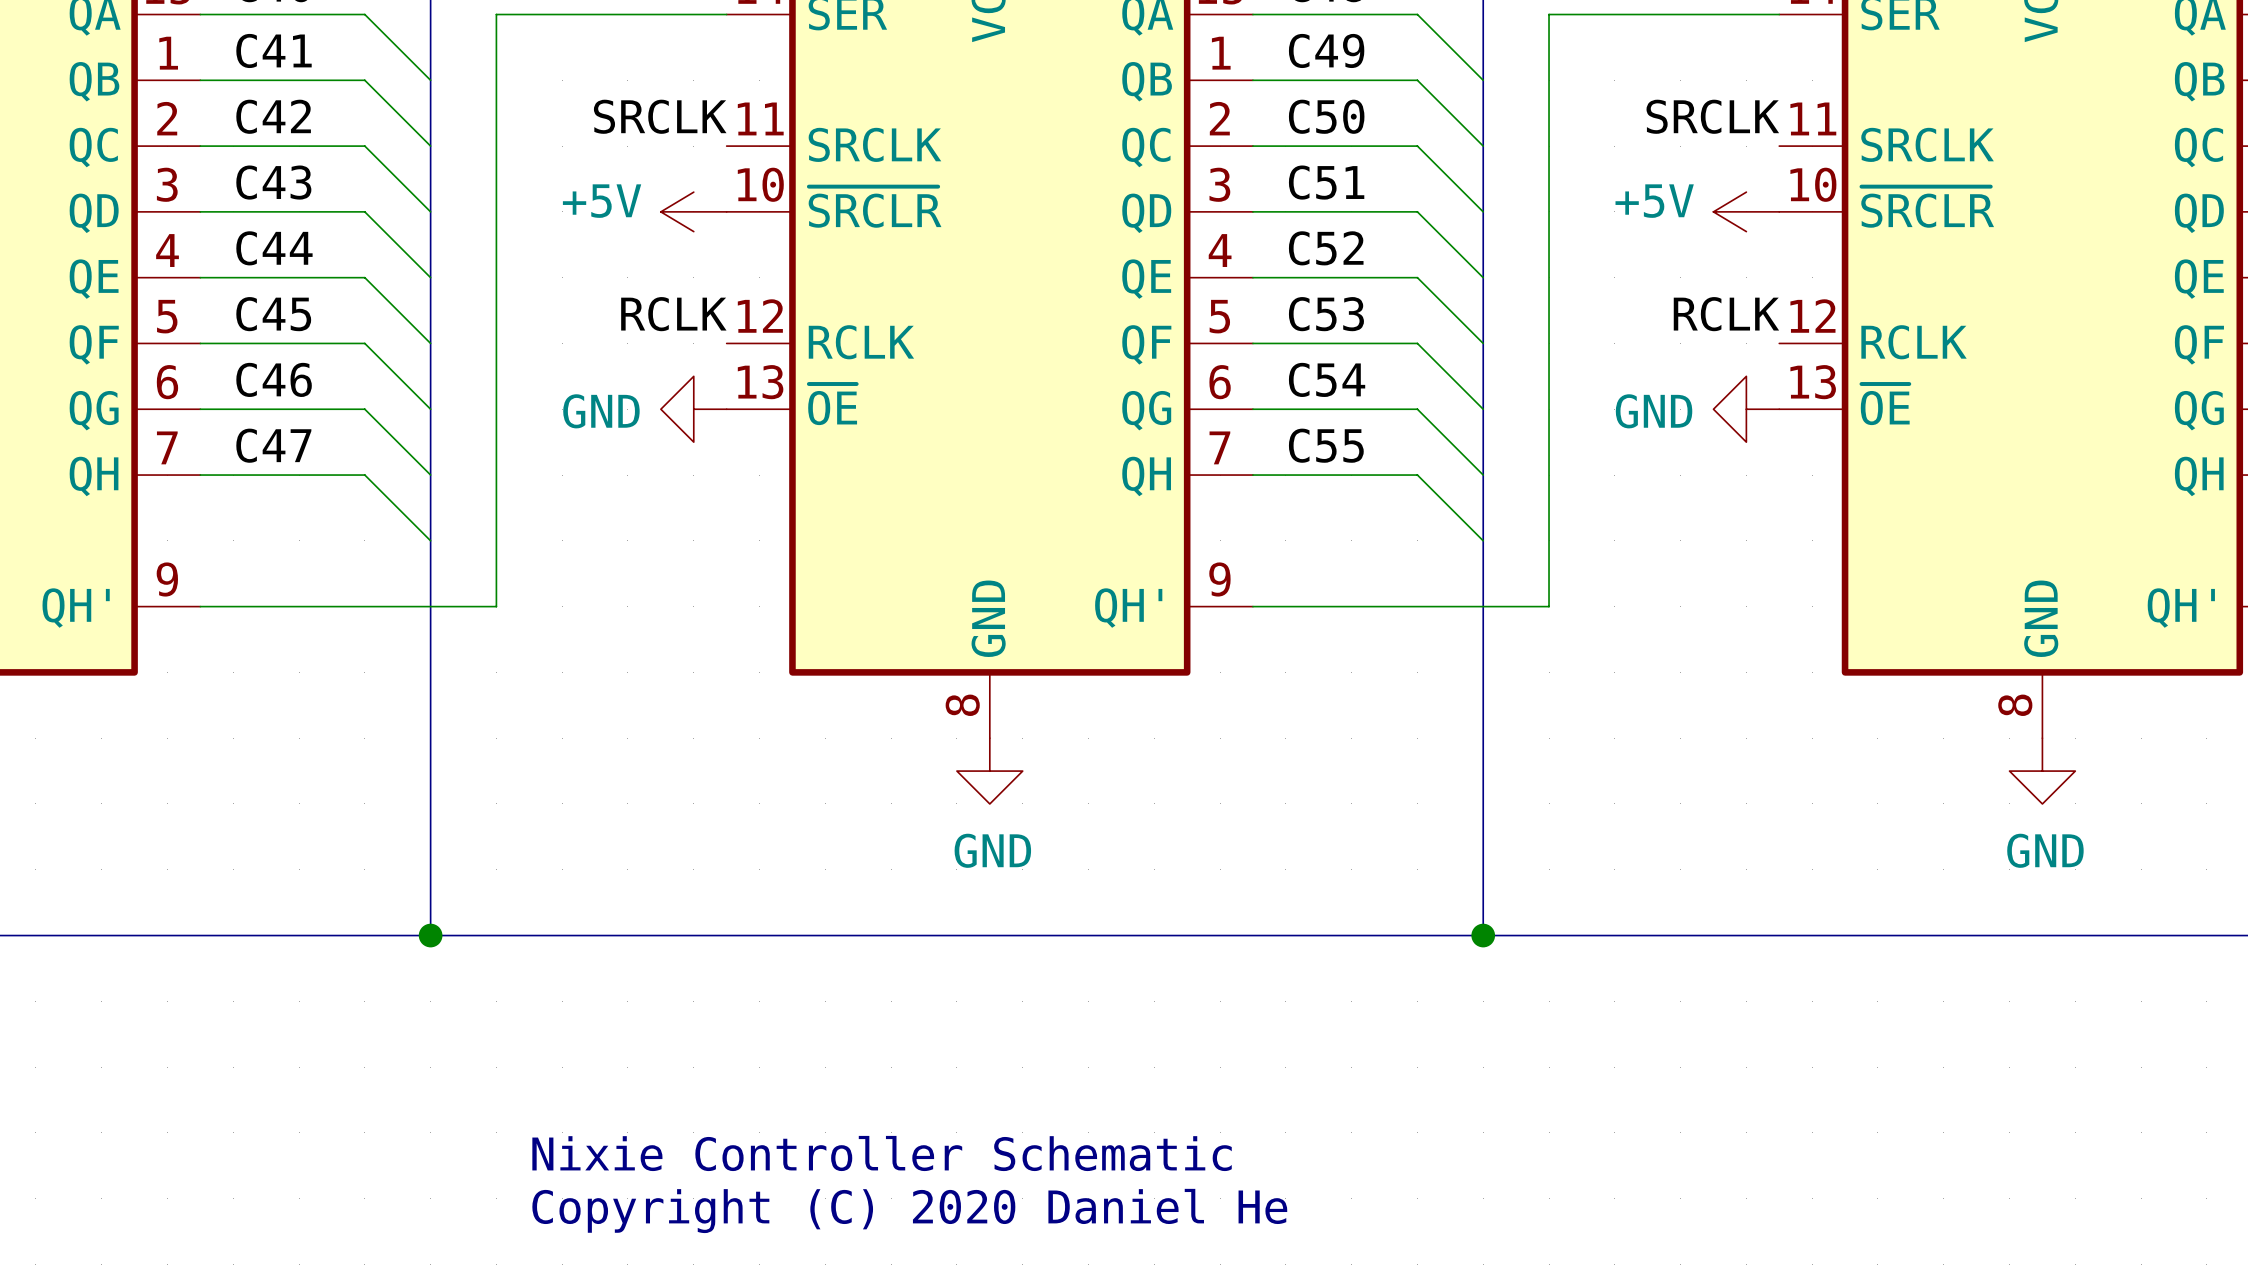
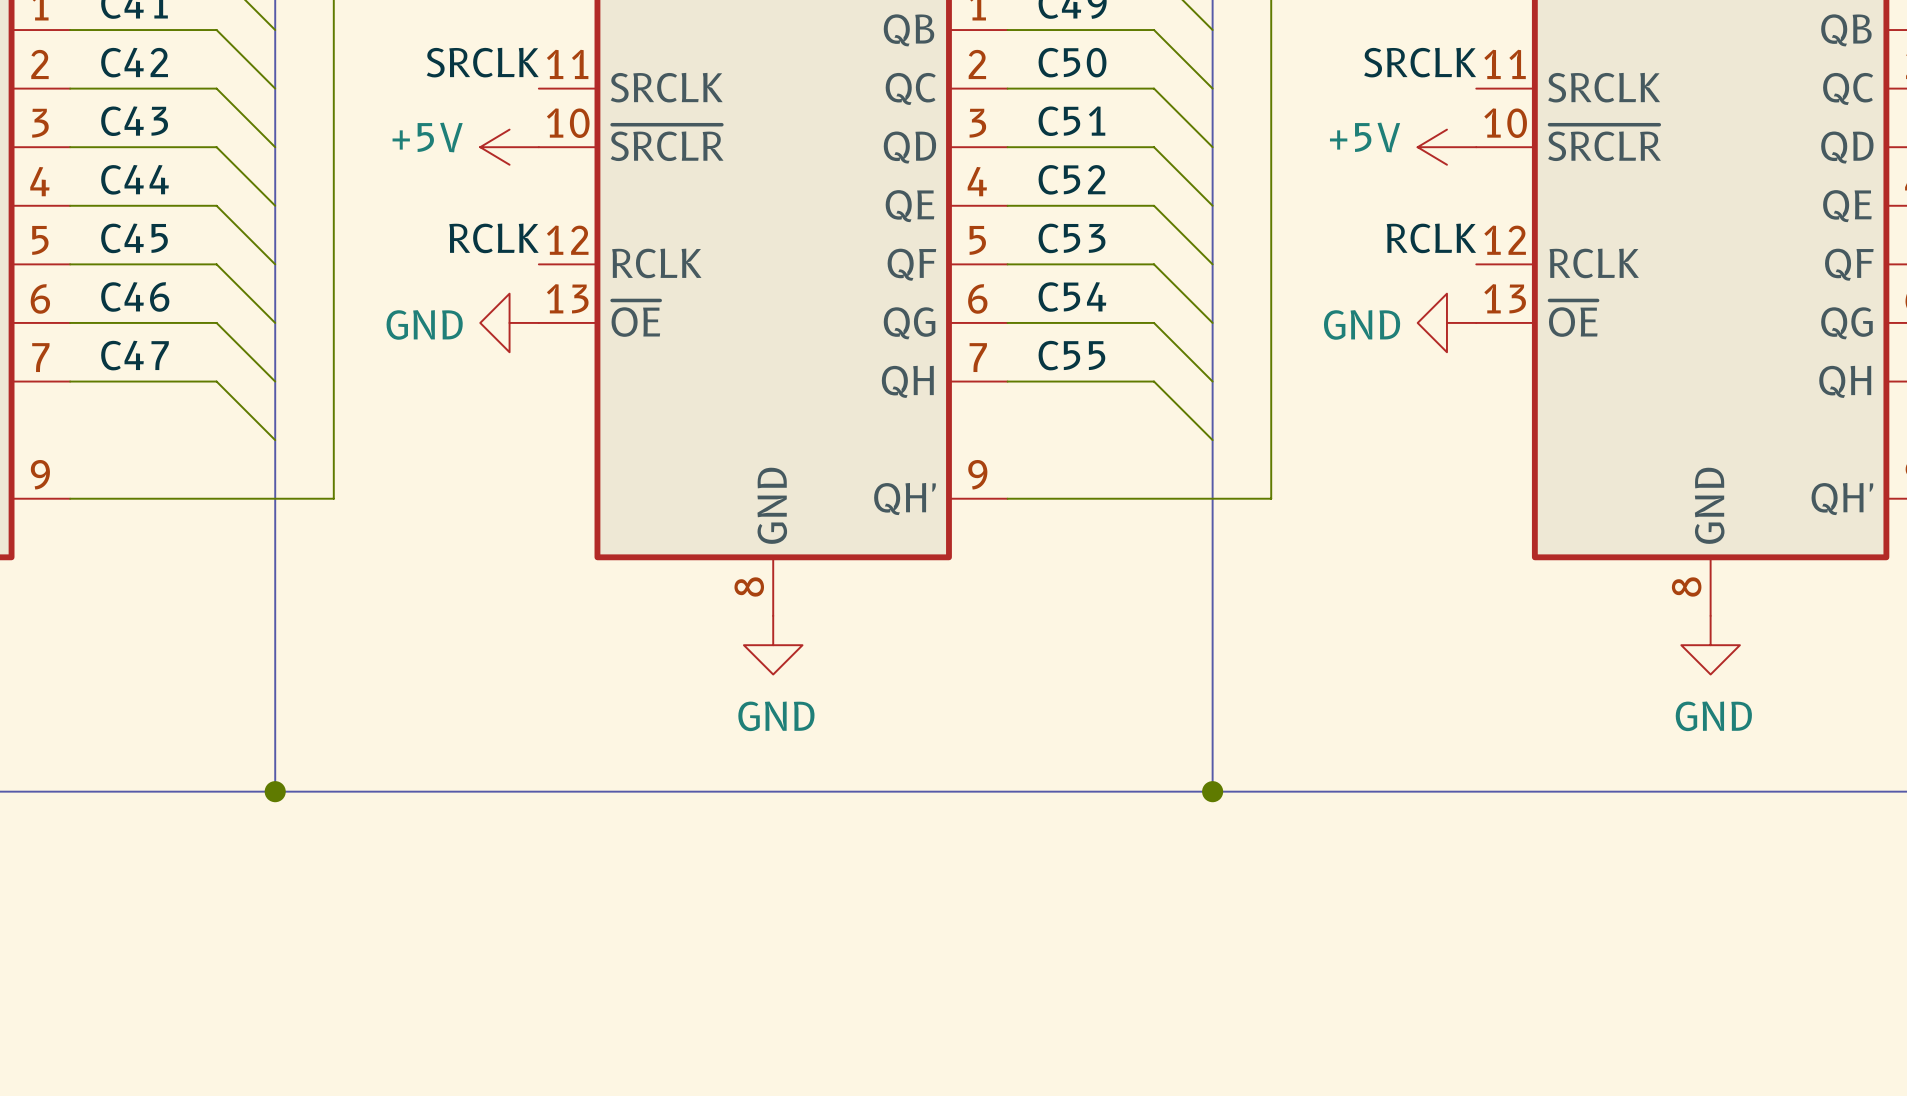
text: Nixie Controller Schematic (882, 1153) -> none
text: Copyright (C) 2020 Daniel He (909, 1210) -> none

